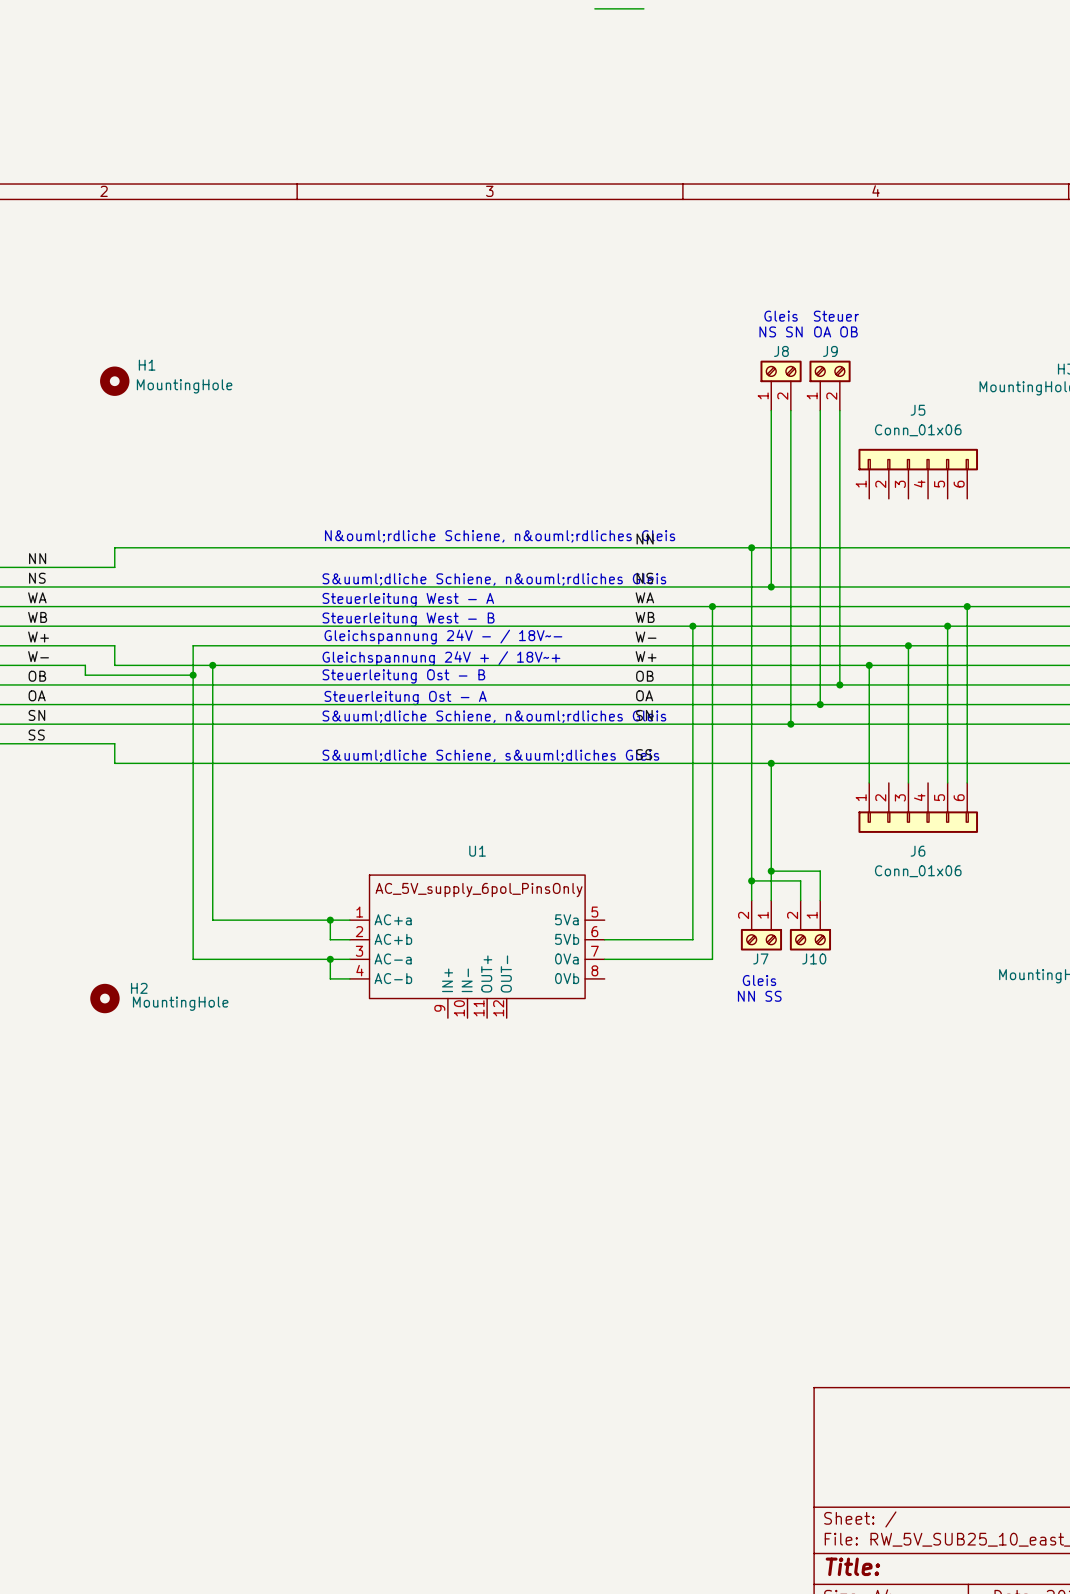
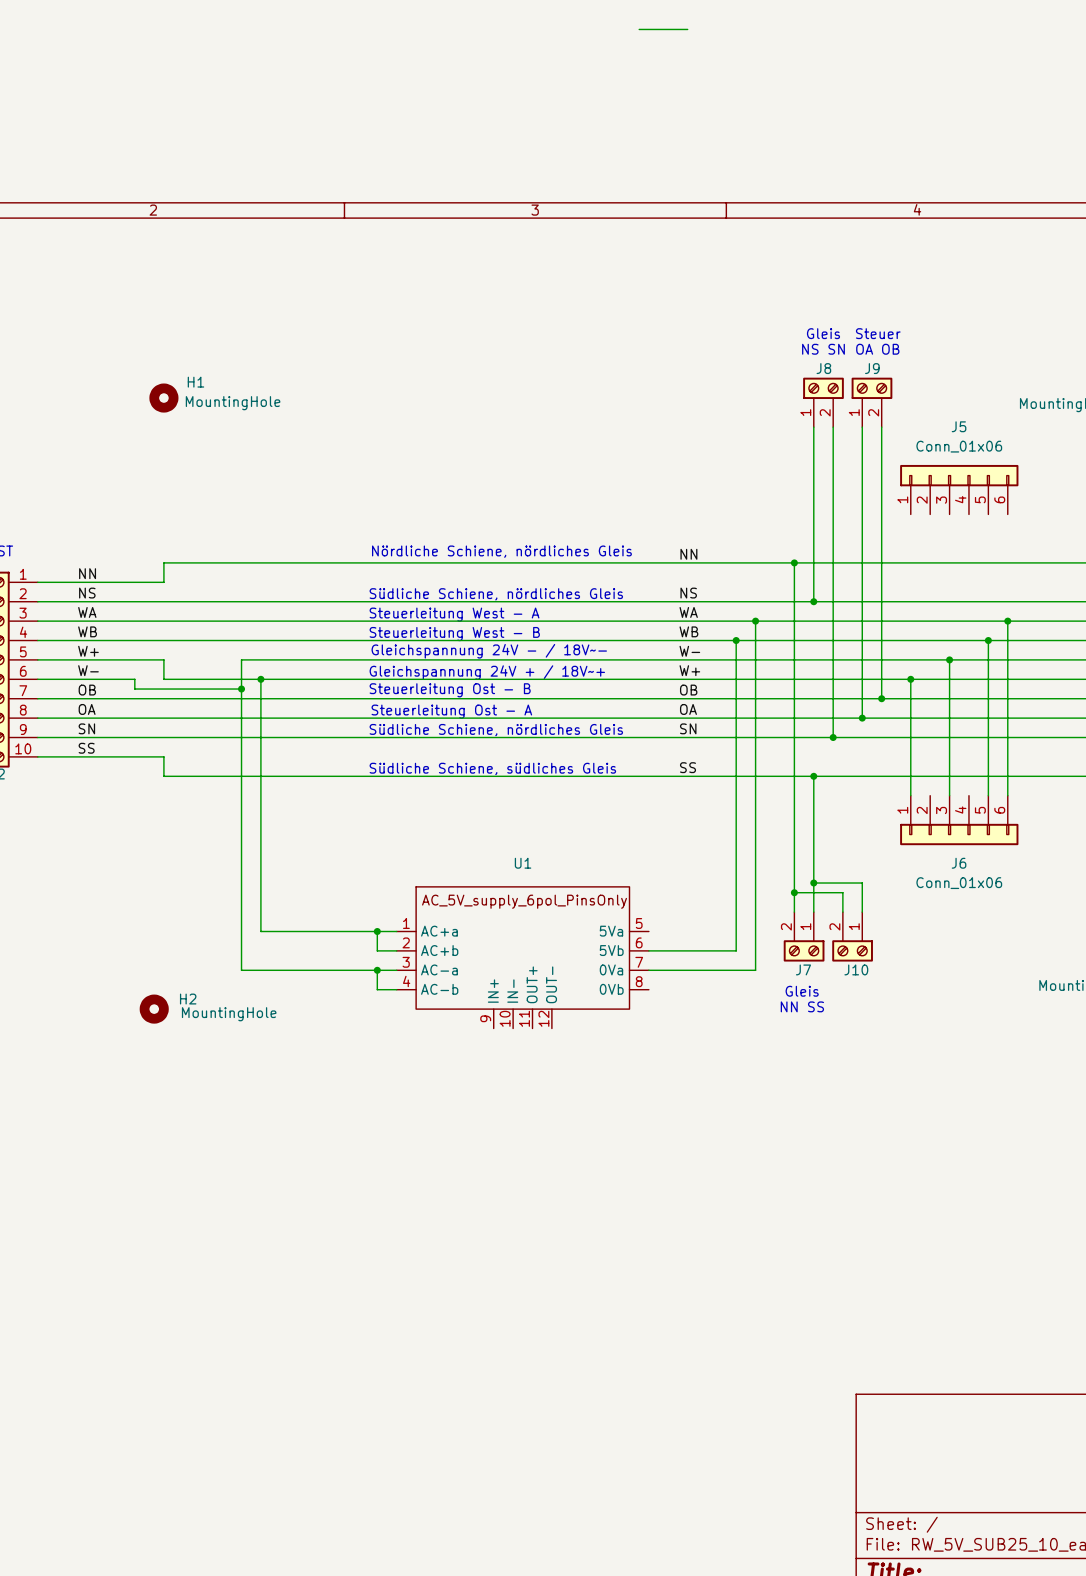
text: N&ouml;rdliche Schiene, n&ouml;rdliches Gleis (500, 536) -> Nördliche Schiene, nördliches Gleis (501, 551)
text: S&uuml;dliche Schiene, n&ouml;rdliches Gleis (494, 579) -> Südliche Schiene, nördliches Gleis (496, 594)
text: S&uuml;dliche Schiene, n&ouml;rdliches Gleis (494, 716) -> Südliche Schiene, nördliches Gleis (496, 730)
text: S&uuml;dliche Schiene, s&uuml;dliches Gleis (490, 755) -> Südliche Schiene, südliches Gleis (492, 768)

